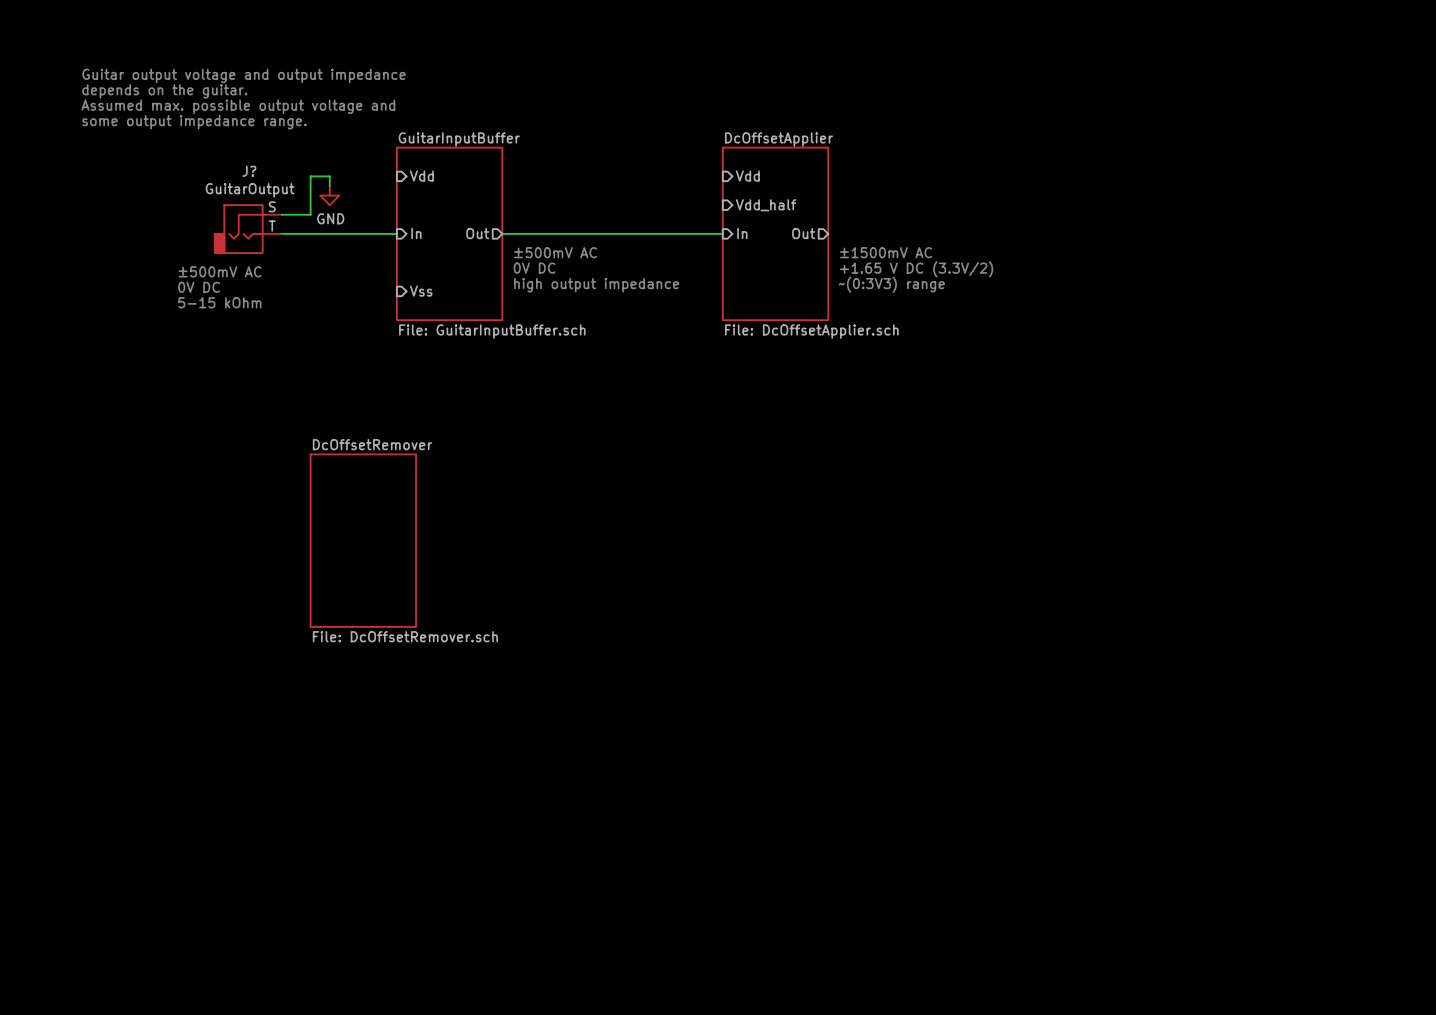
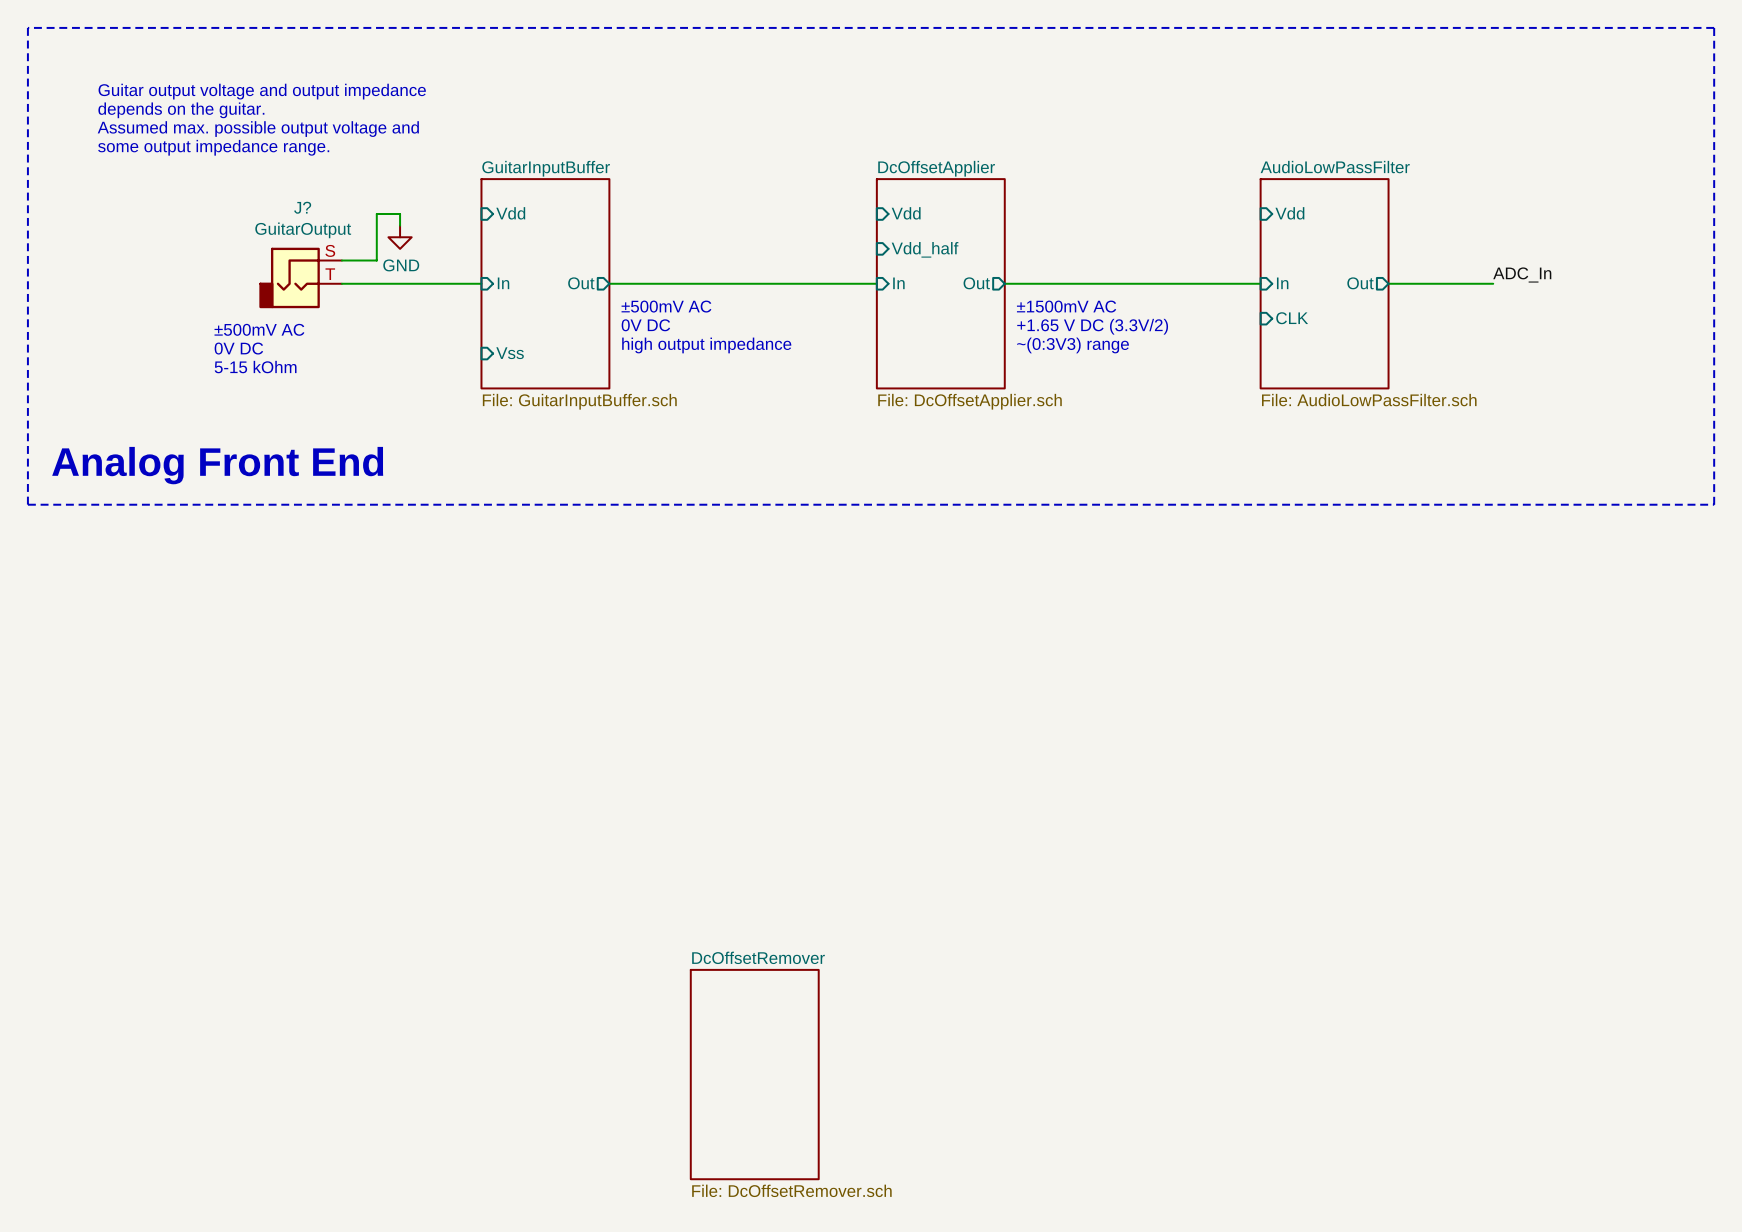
line: none -> (27, 27) (27, 504) (1714, 504) (1714, 27) (27, 27)
sheet pin: none -> Vdd (1289, 213)
label: none -> ADC_In (1522, 274)
wire: none -> (1004, 283) (1260, 283)
sheet pin: none -> In (1282, 283)
sheet AudioLowPassFilter: none -> File: AudioLowPassFilter.sch (1324, 283)
sheet pin: none -> Out (1360, 283)
wire: none -> (1388, 283) (1493, 283)
sheet pin: none -> CLK (1292, 318)
text: none -> Analog Front End (217, 465)
sheet DcOffsetRemover: File: DcOffsetRemover.sch (363, 540) -> none
sheet DcOffsetRemover: none -> File: DcOffsetRemover.sch (754, 1074)

